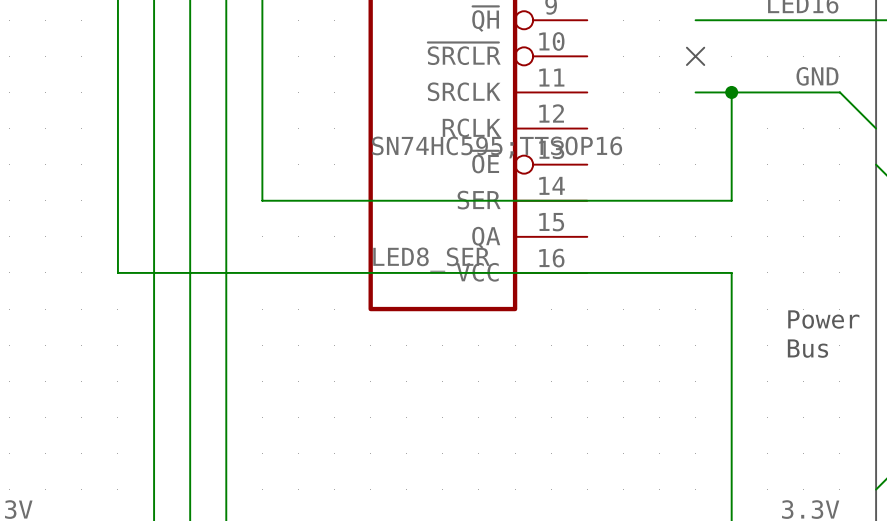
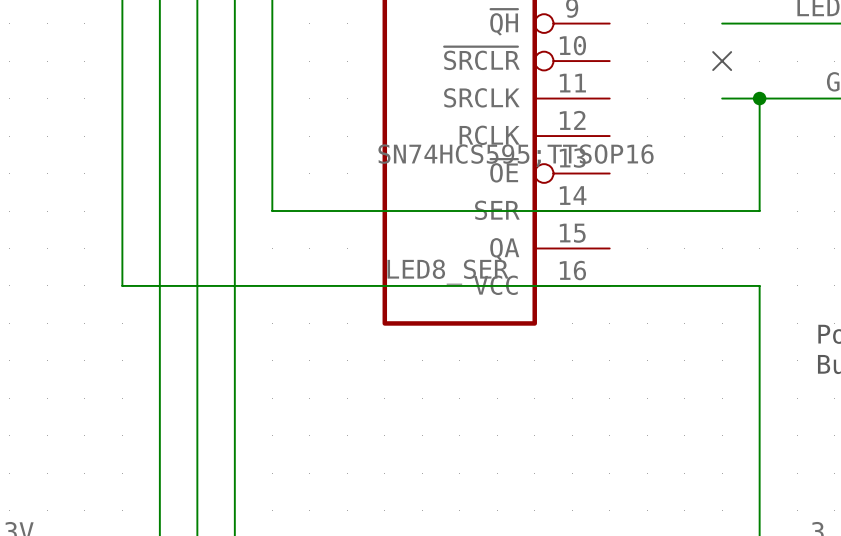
part value: SN74HC595;TTSOP16 (497, 147) -> SN74HCS595;TTSOP16 (516, 155)

